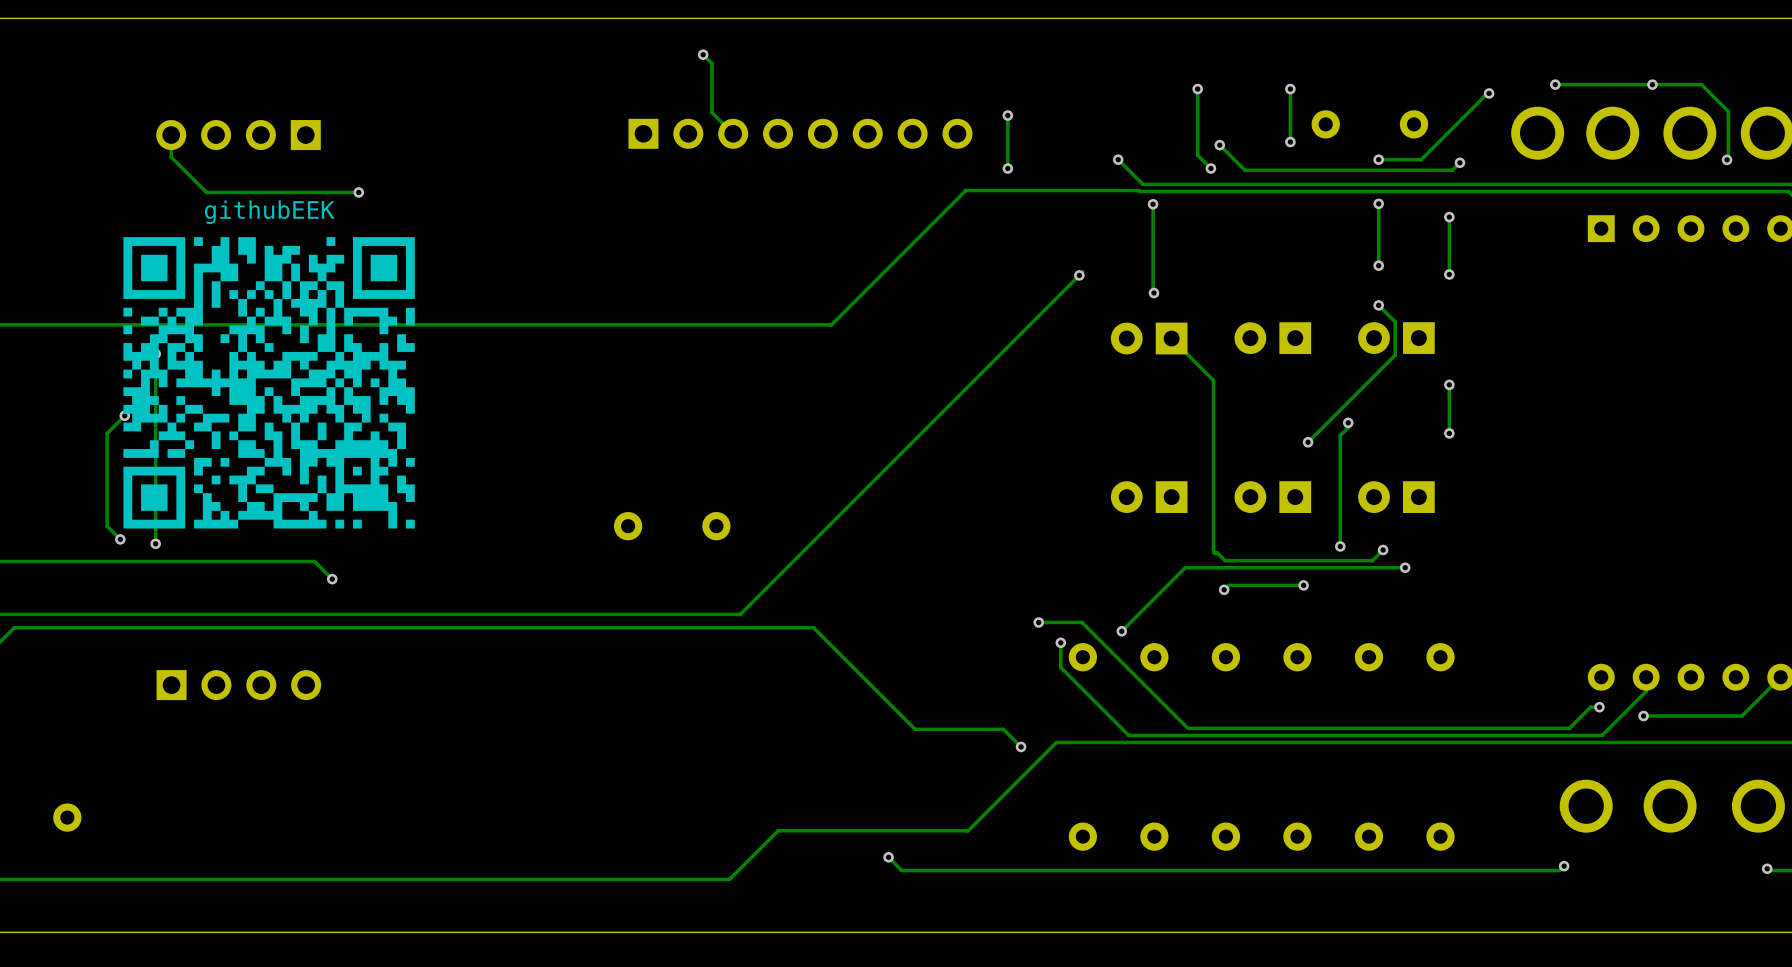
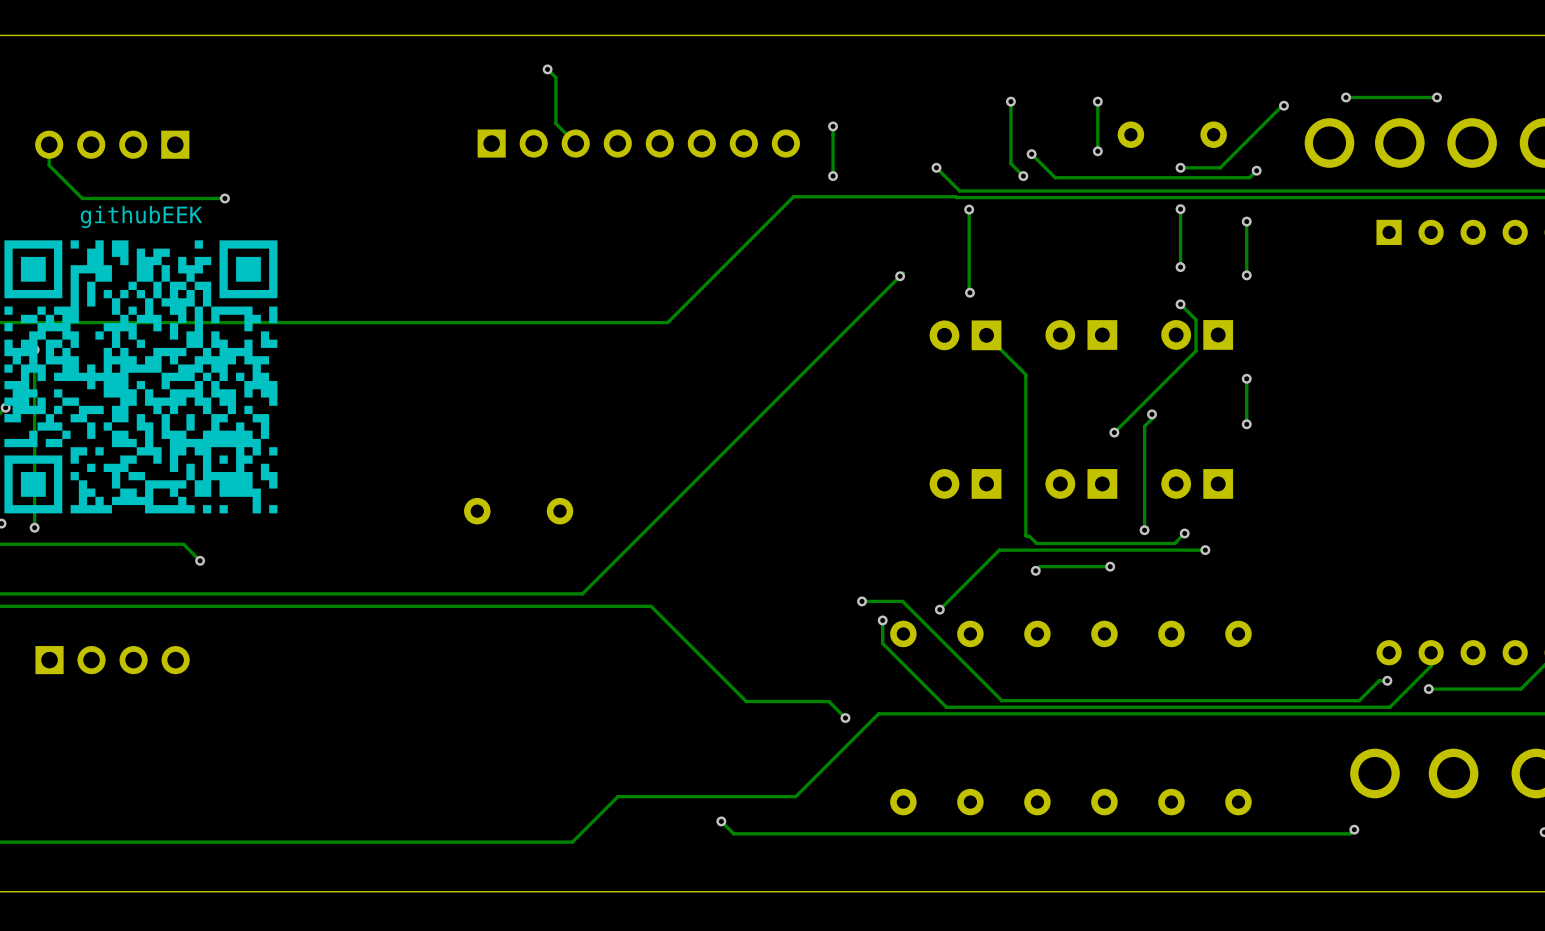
track: (1652, 84) (1701, 84) (1728, 111) (1727, 159) -> none
via: (1727, 159) -> none

